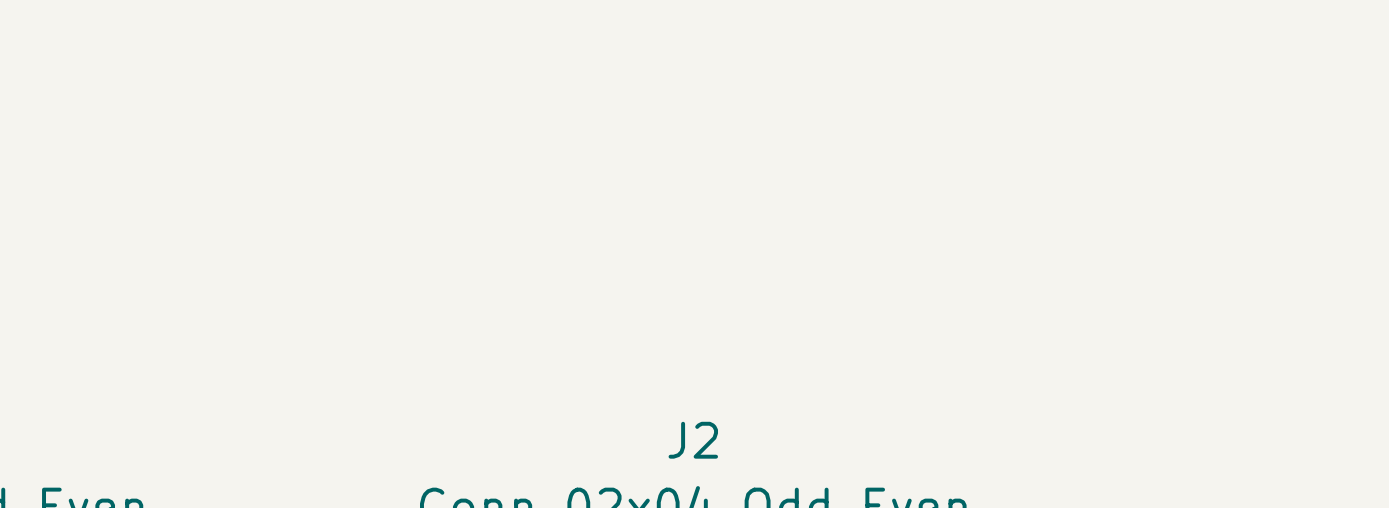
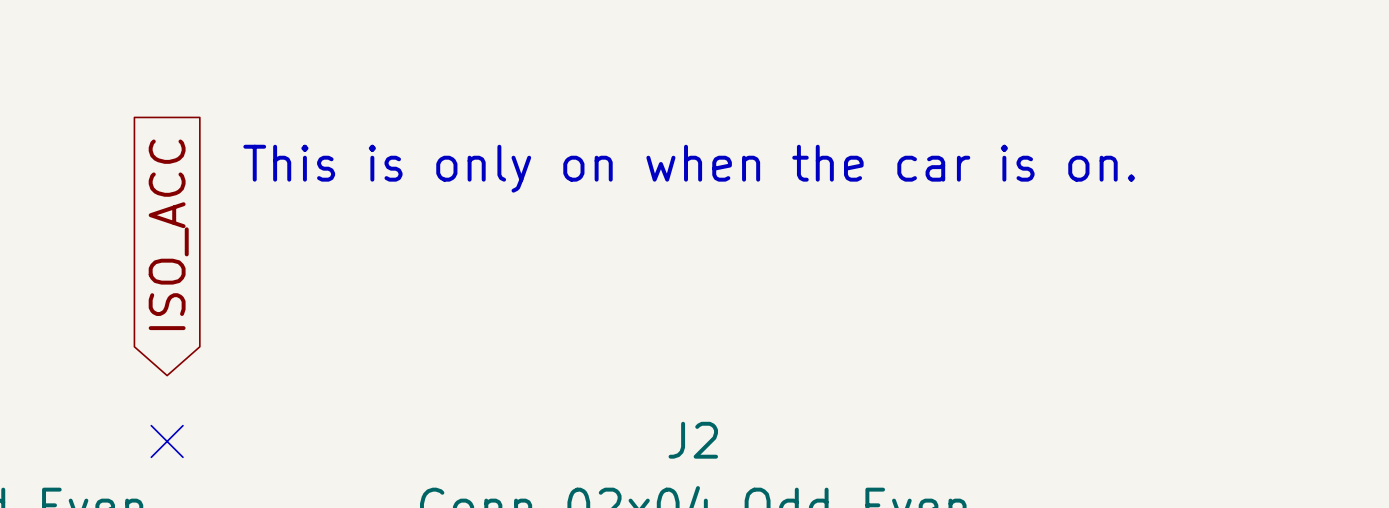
text: none -> This is only on when the car is on. (689, 168)
global label: none -> ISO_ACC (168, 234)
no-connect mark: none -> (167, 441)

